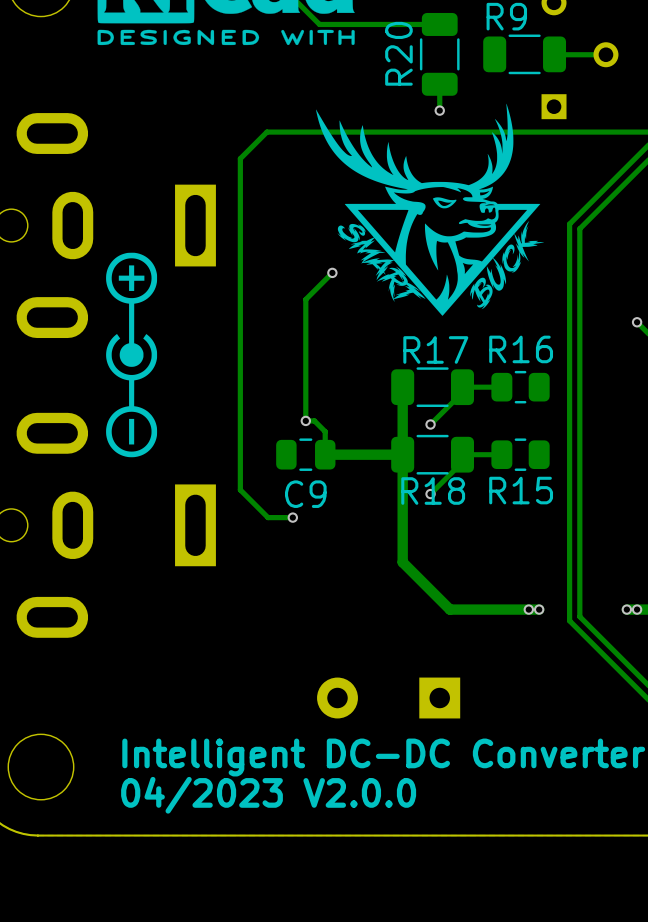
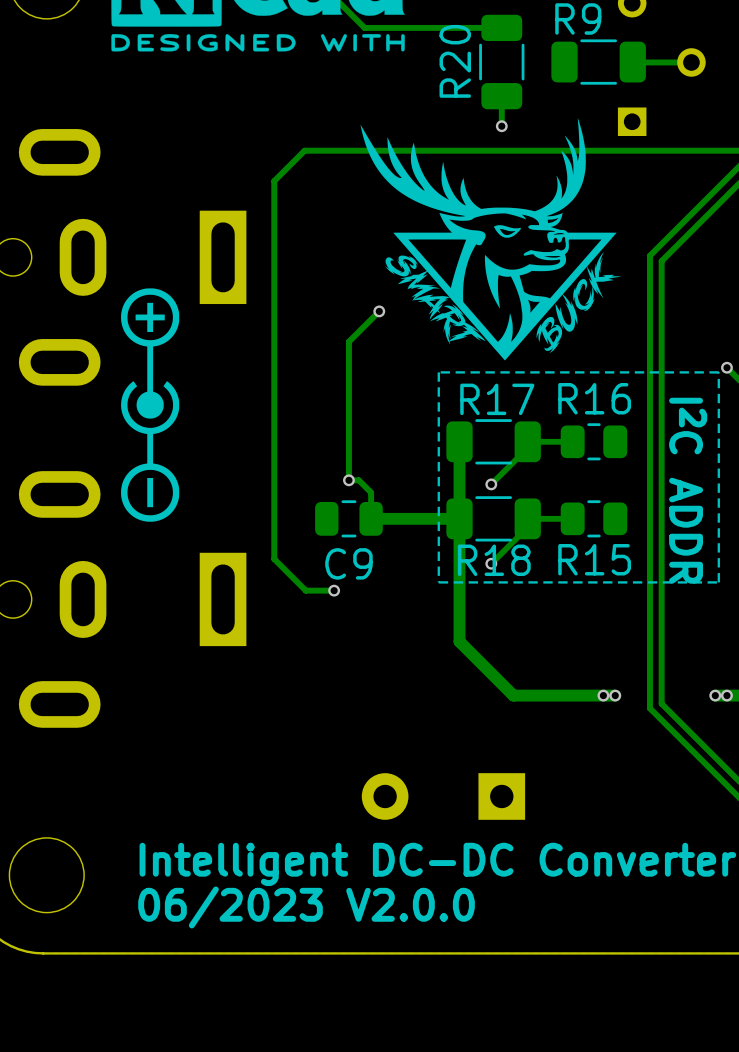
line: none -> (718, 372) (438, 372) (438, 582) (718, 582) (718, 372)
text: none -> I2C ADDR (688, 490)
text: 04/2023 V2.0.0 (268, 795) -> 06/2023 V2.0.0 (306, 907)

